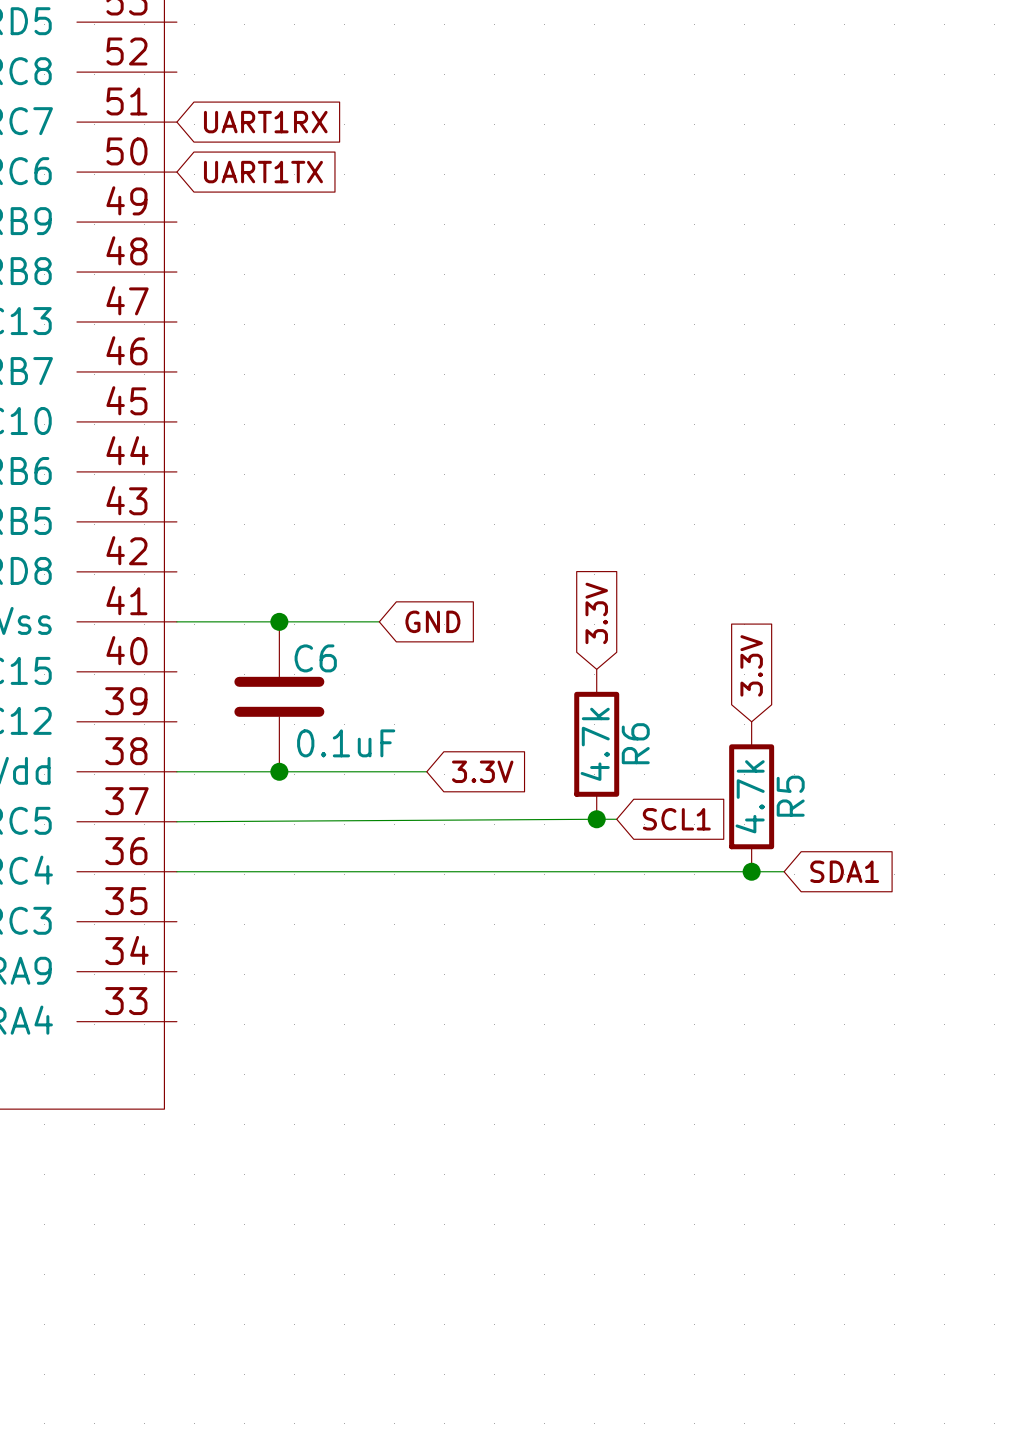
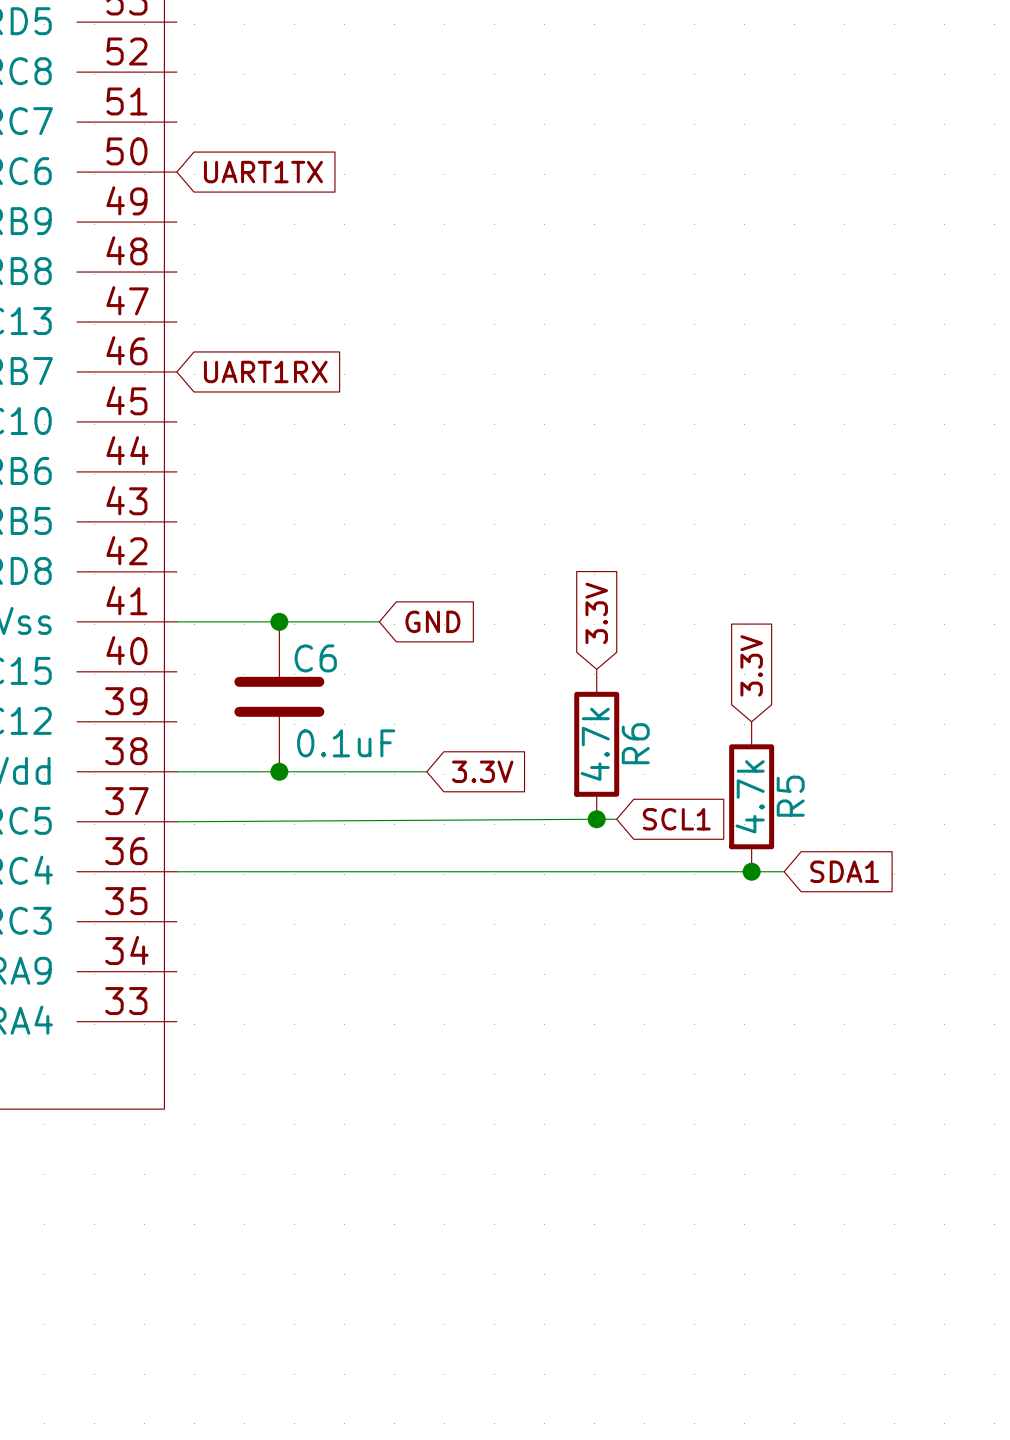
global label position: UART1RX (265, 122) -> UART1RX (265, 371)

